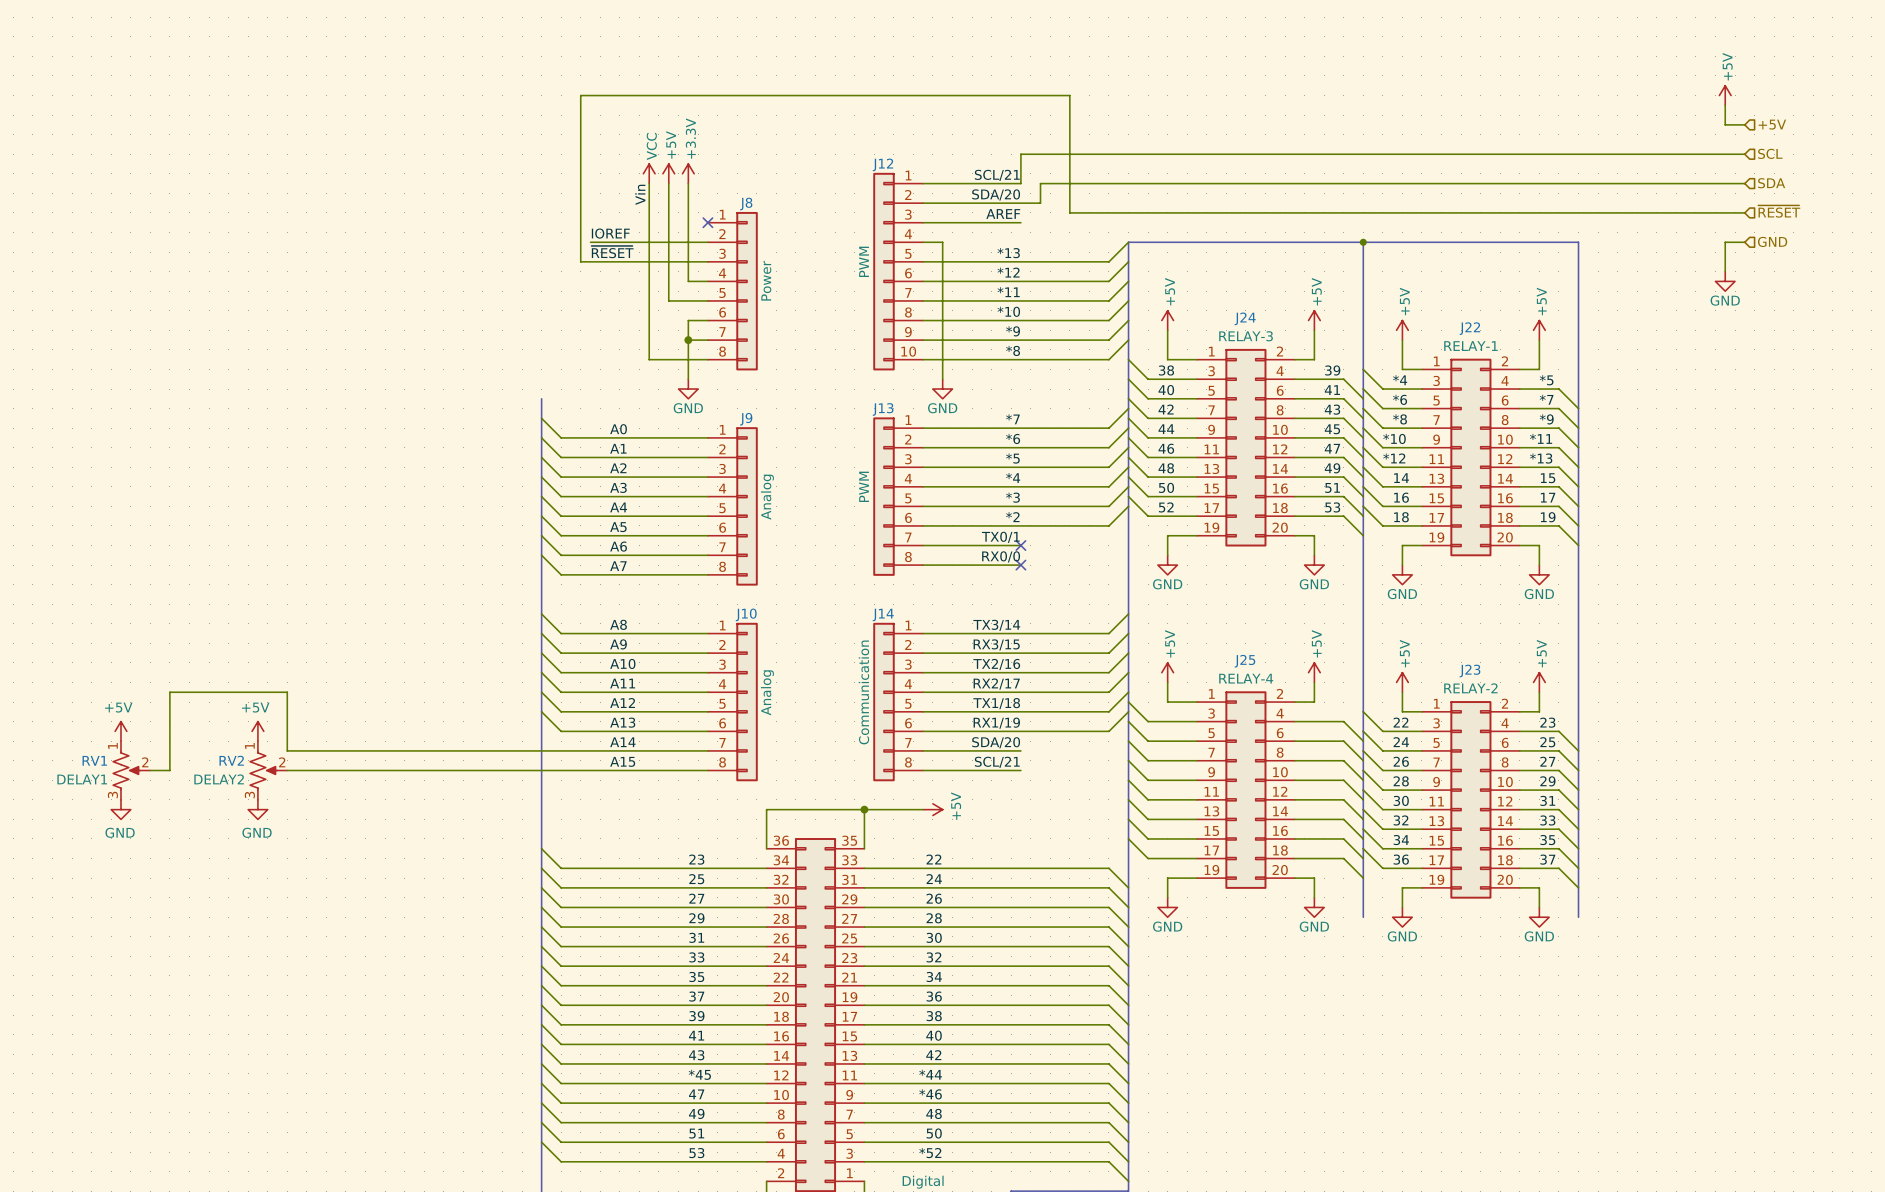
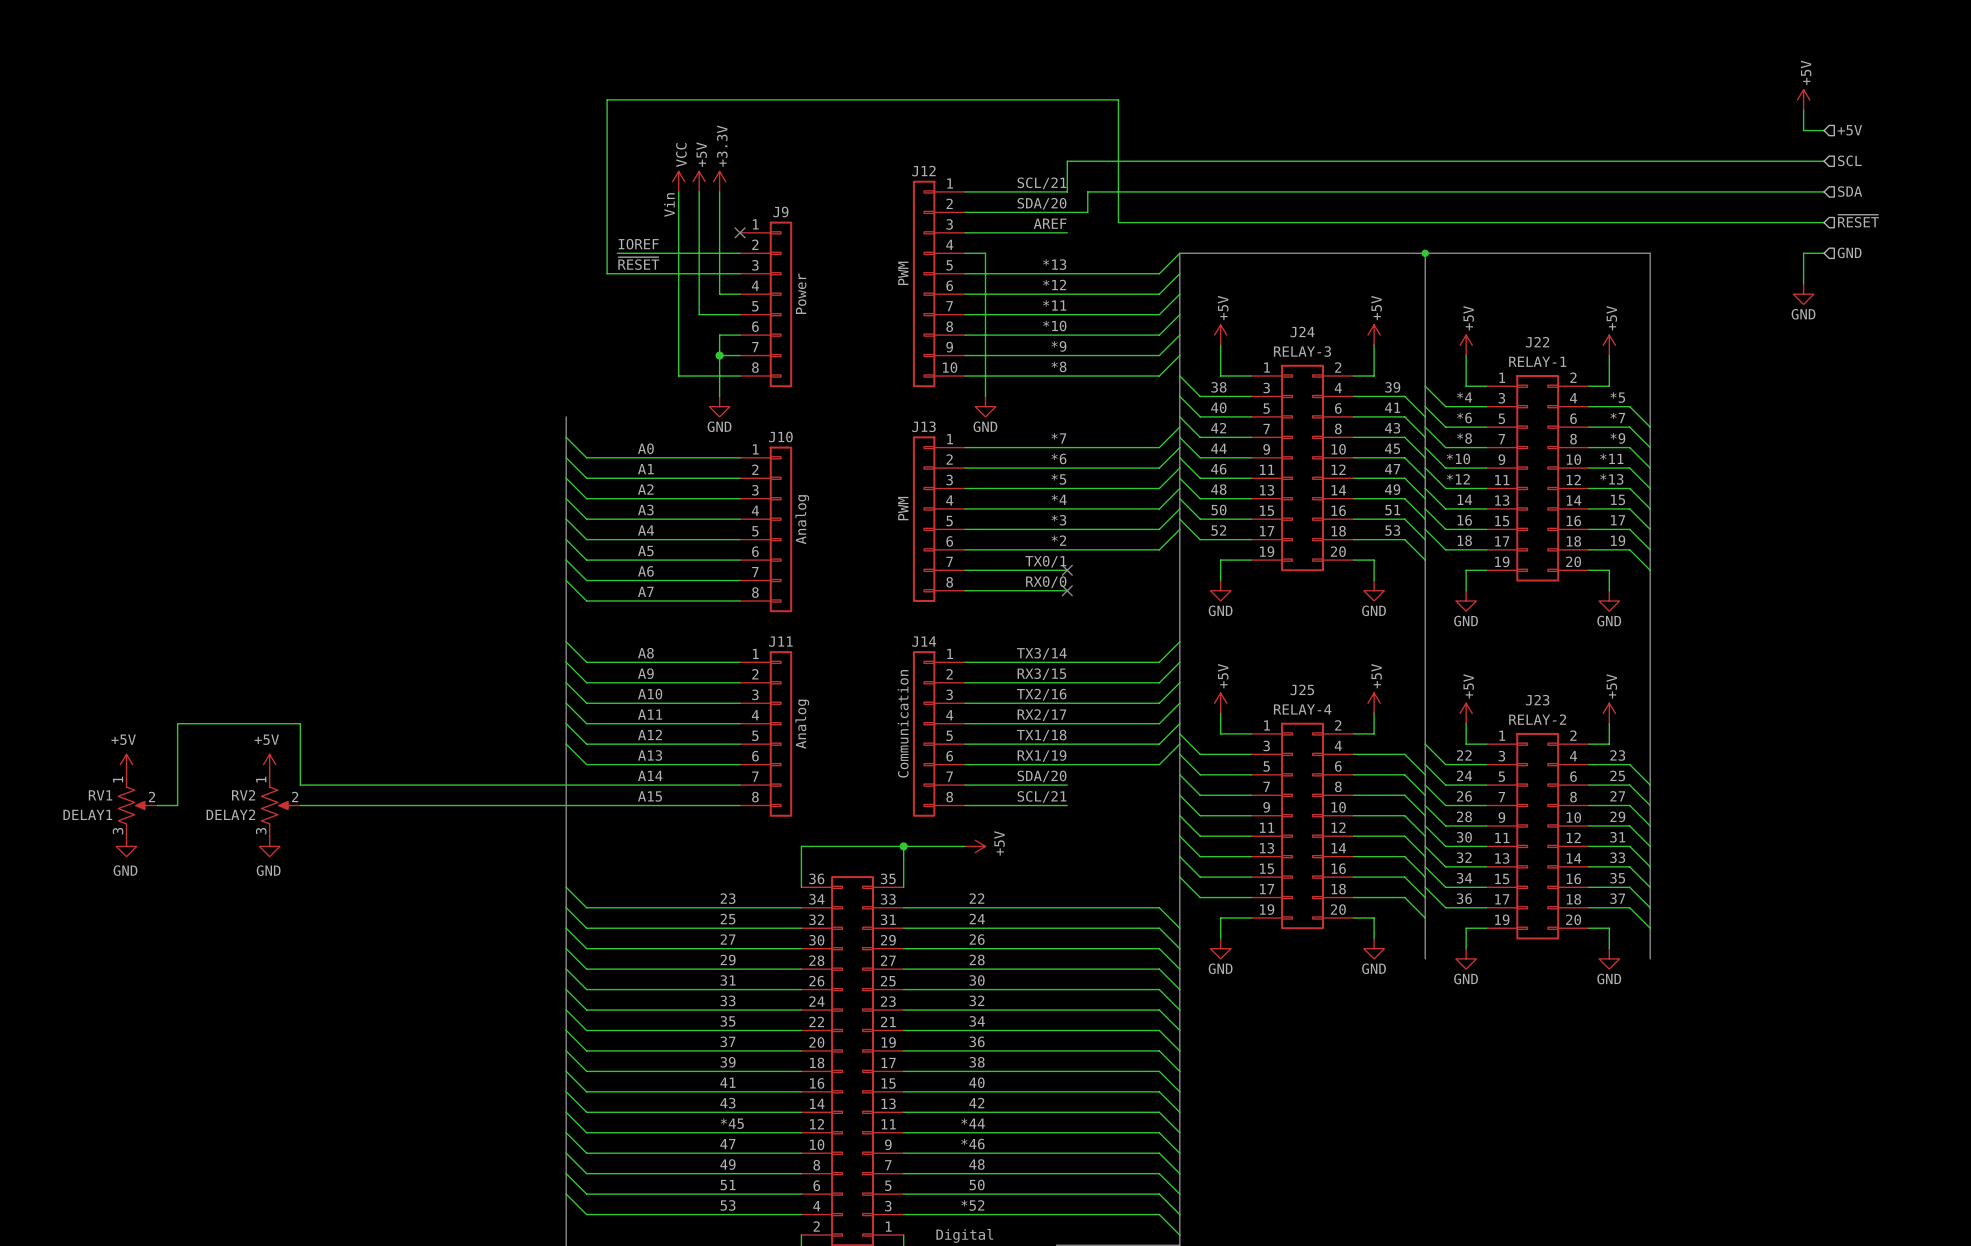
J8 name: J8 (746, 204) -> J9 (780, 212)
J9 name: J9 (746, 419) -> J10 (780, 436)
J10 name: J10 (746, 614) -> J11 (780, 641)

